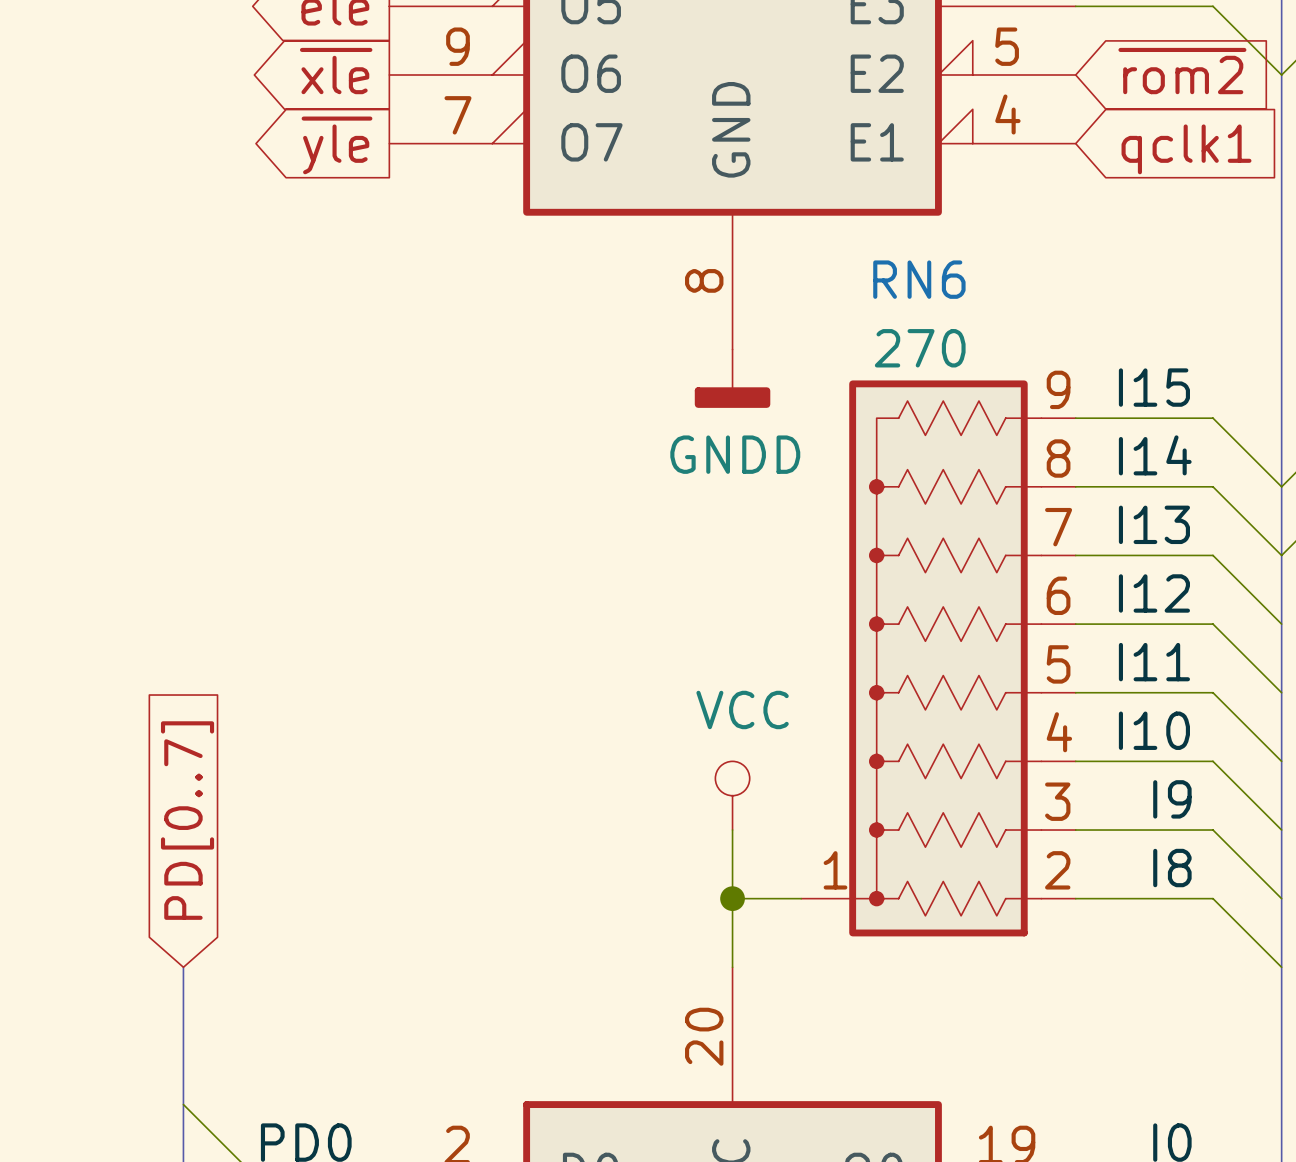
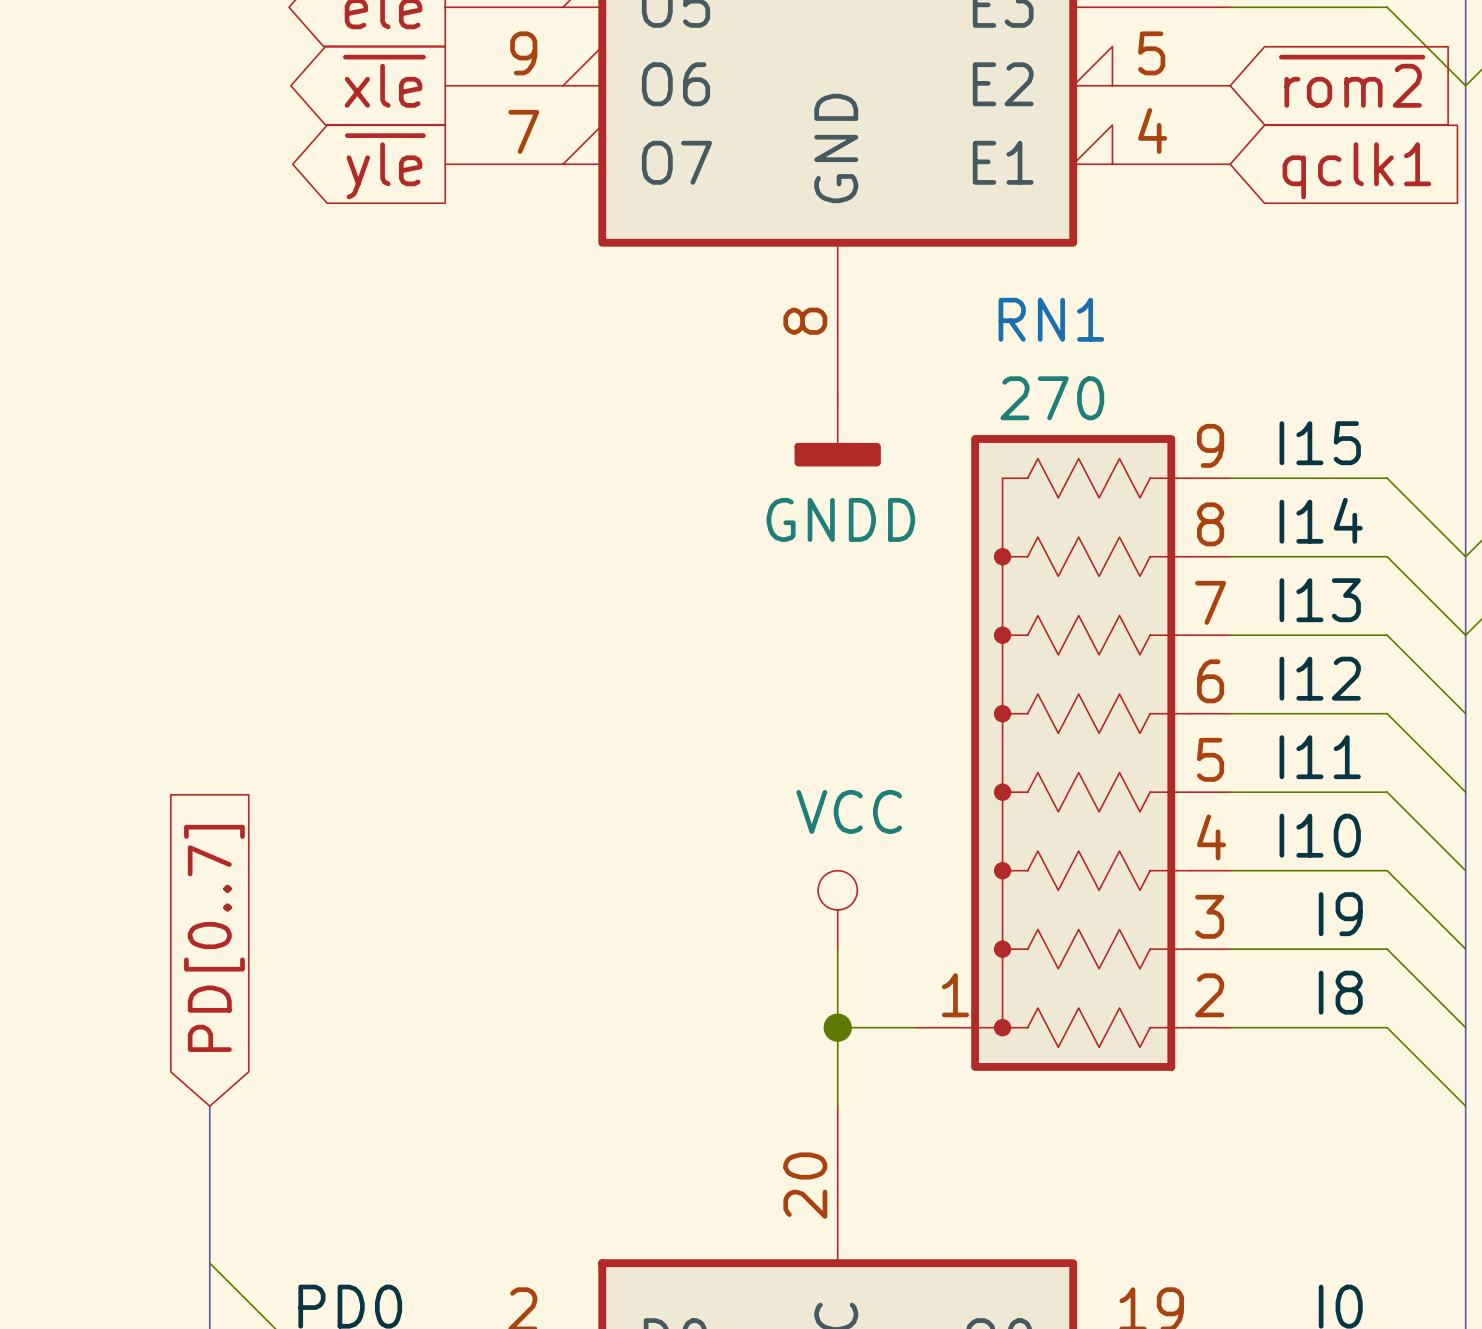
RN6 name: RN6 (919, 279) -> RN1 (1051, 319)

